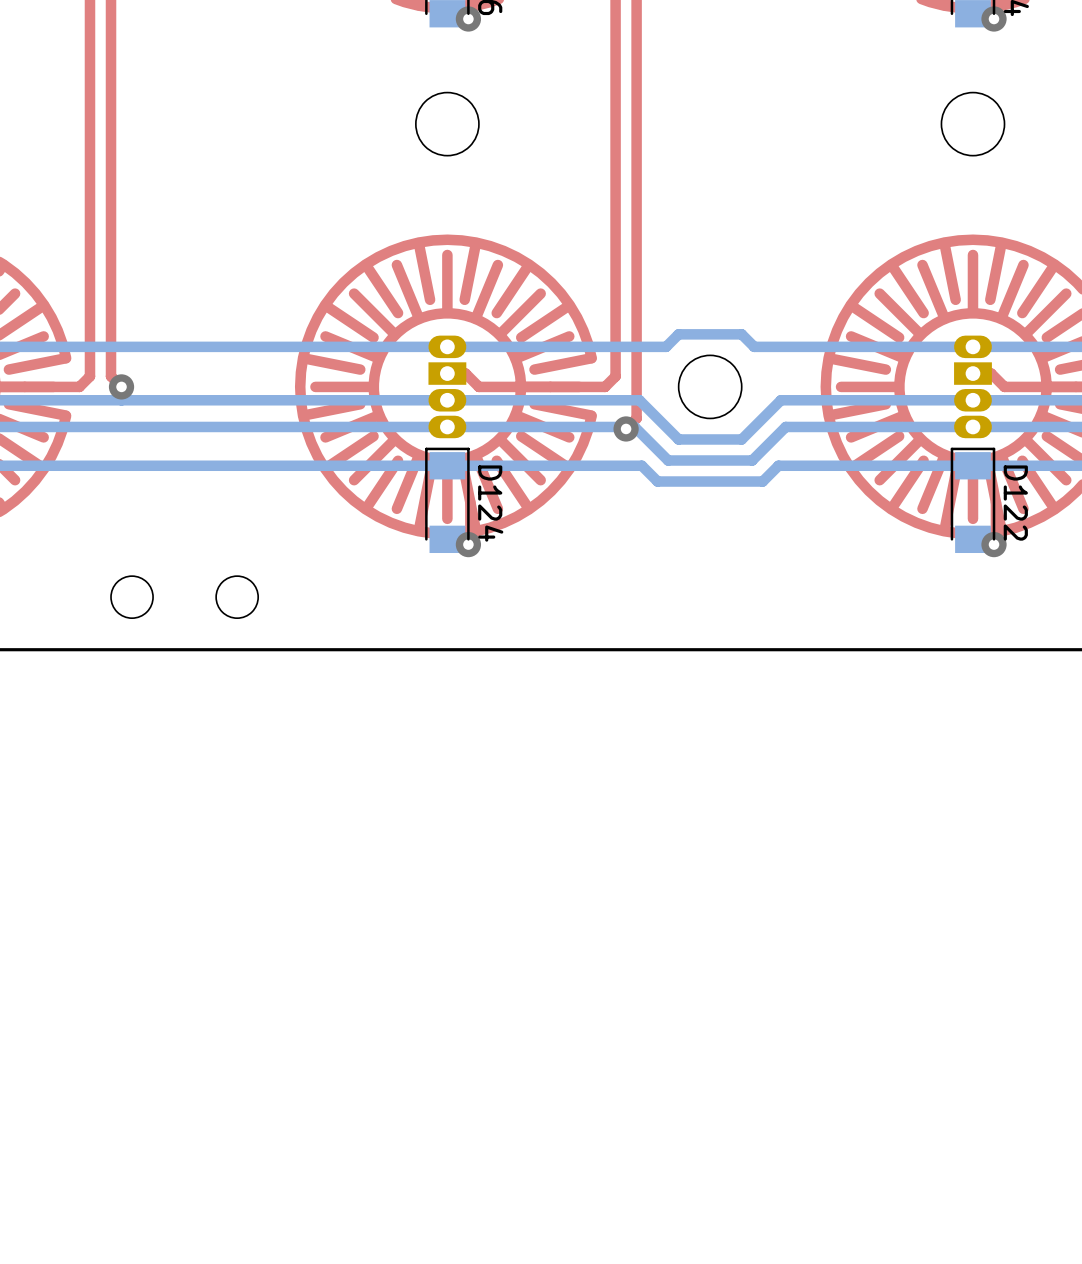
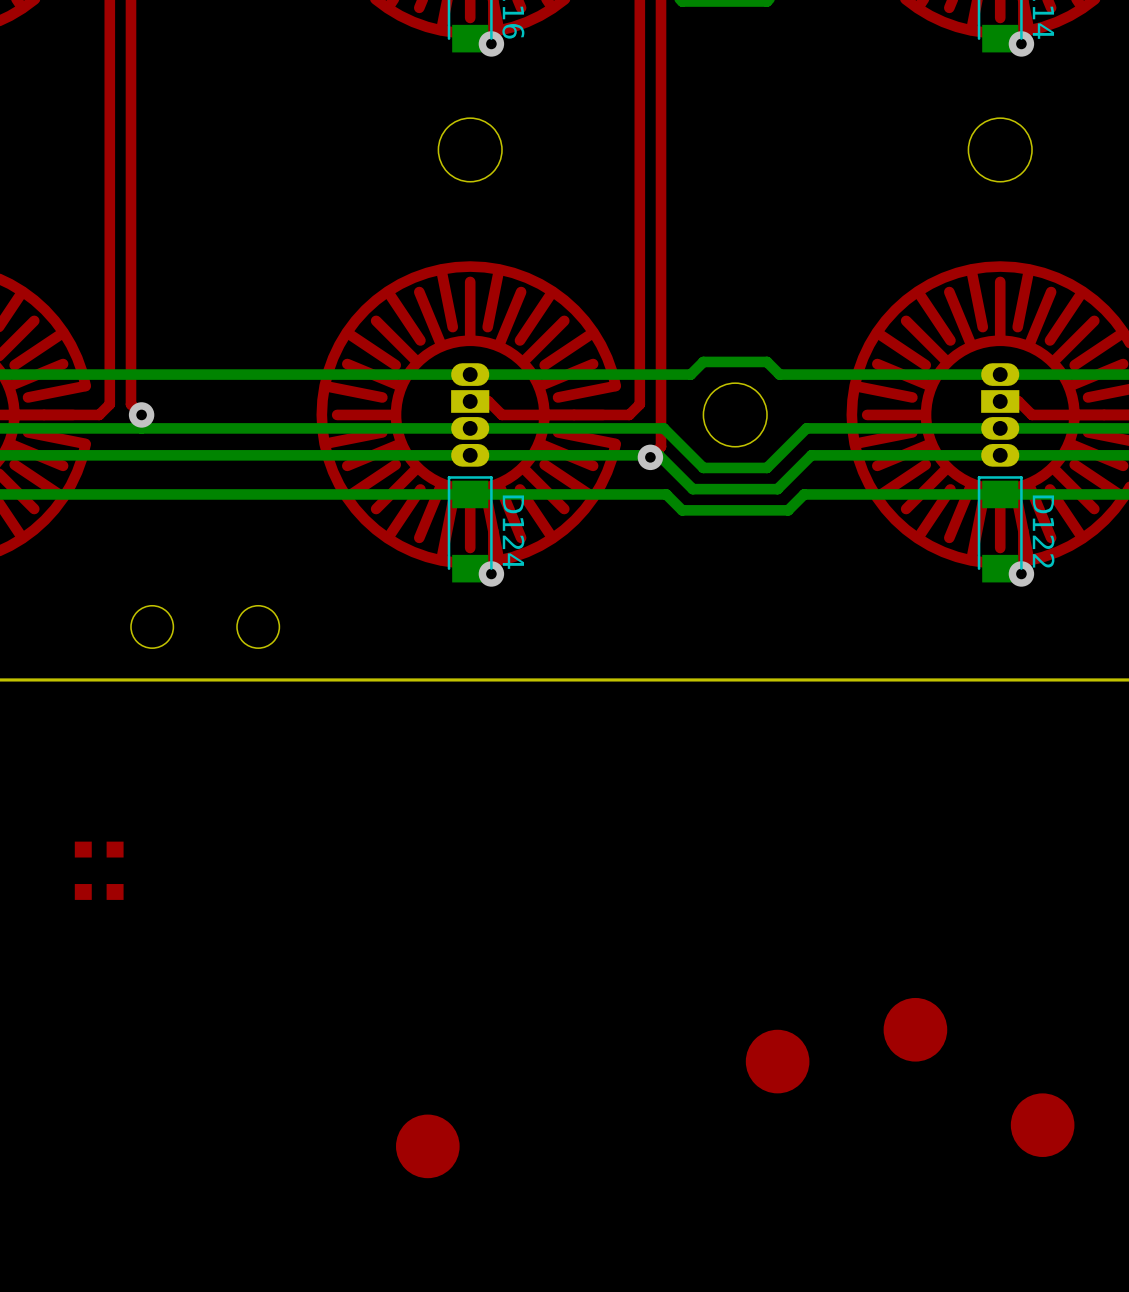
part: none -> (99, 849)
part: none -> (99, 891)
part: none -> (915, 1029)
part: none -> (777, 1061)
part: none -> (1042, 1125)
part: none -> (427, 1146)

